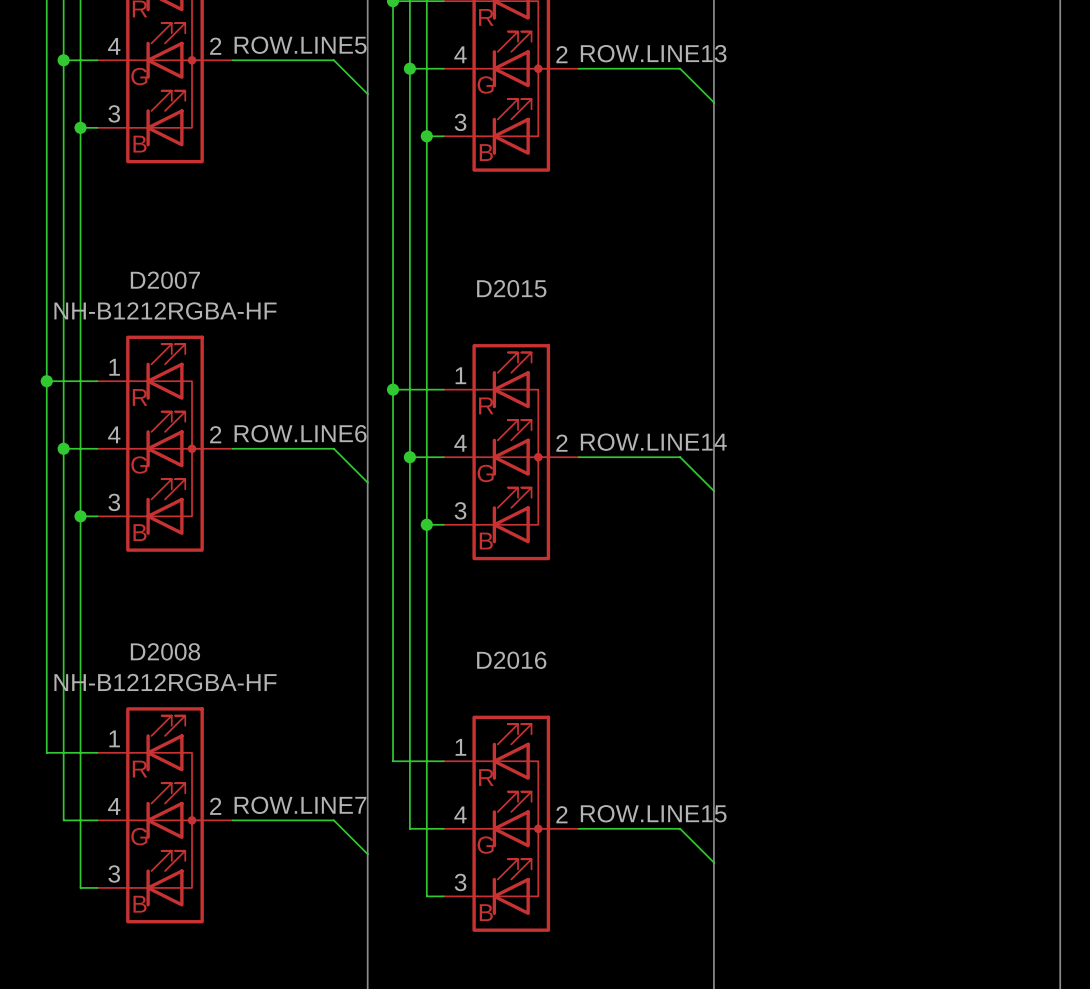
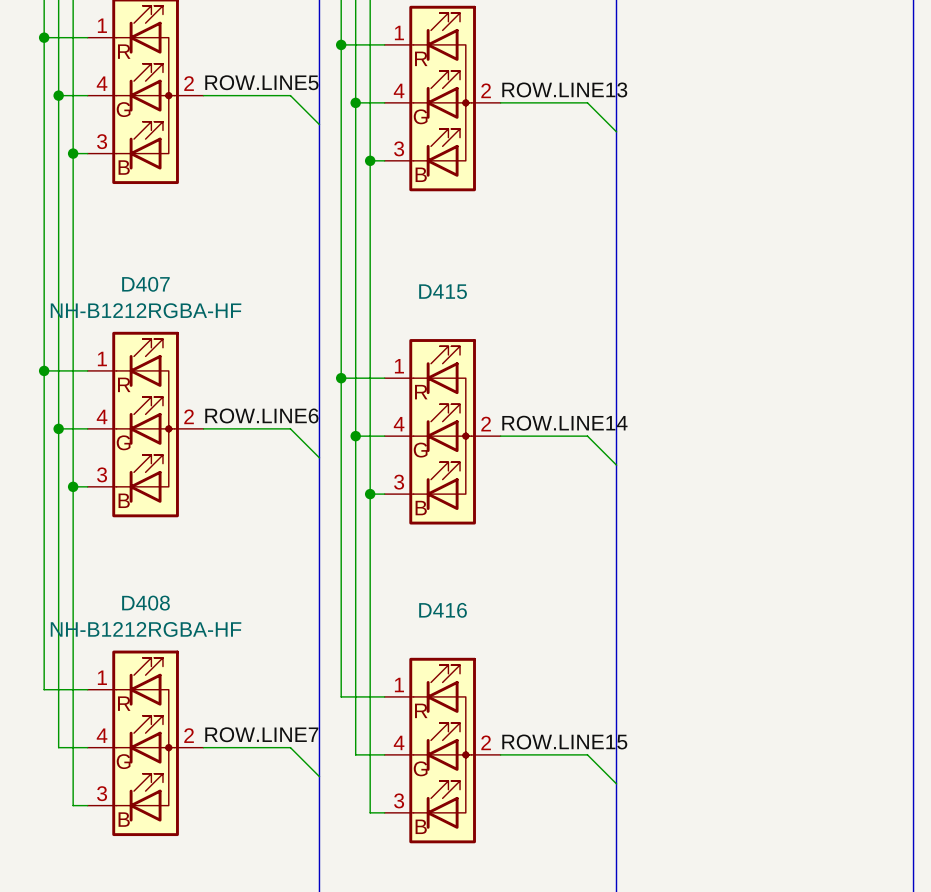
D2007 name: D2007 (165, 280) -> D407 (145, 284)
D2015 name: D2015 (511, 288) -> D415 (443, 291)
D2008 name: D2008 (165, 651) -> D408 (146, 603)
D2016 name: D2016 (511, 660) -> D416 (443, 610)

